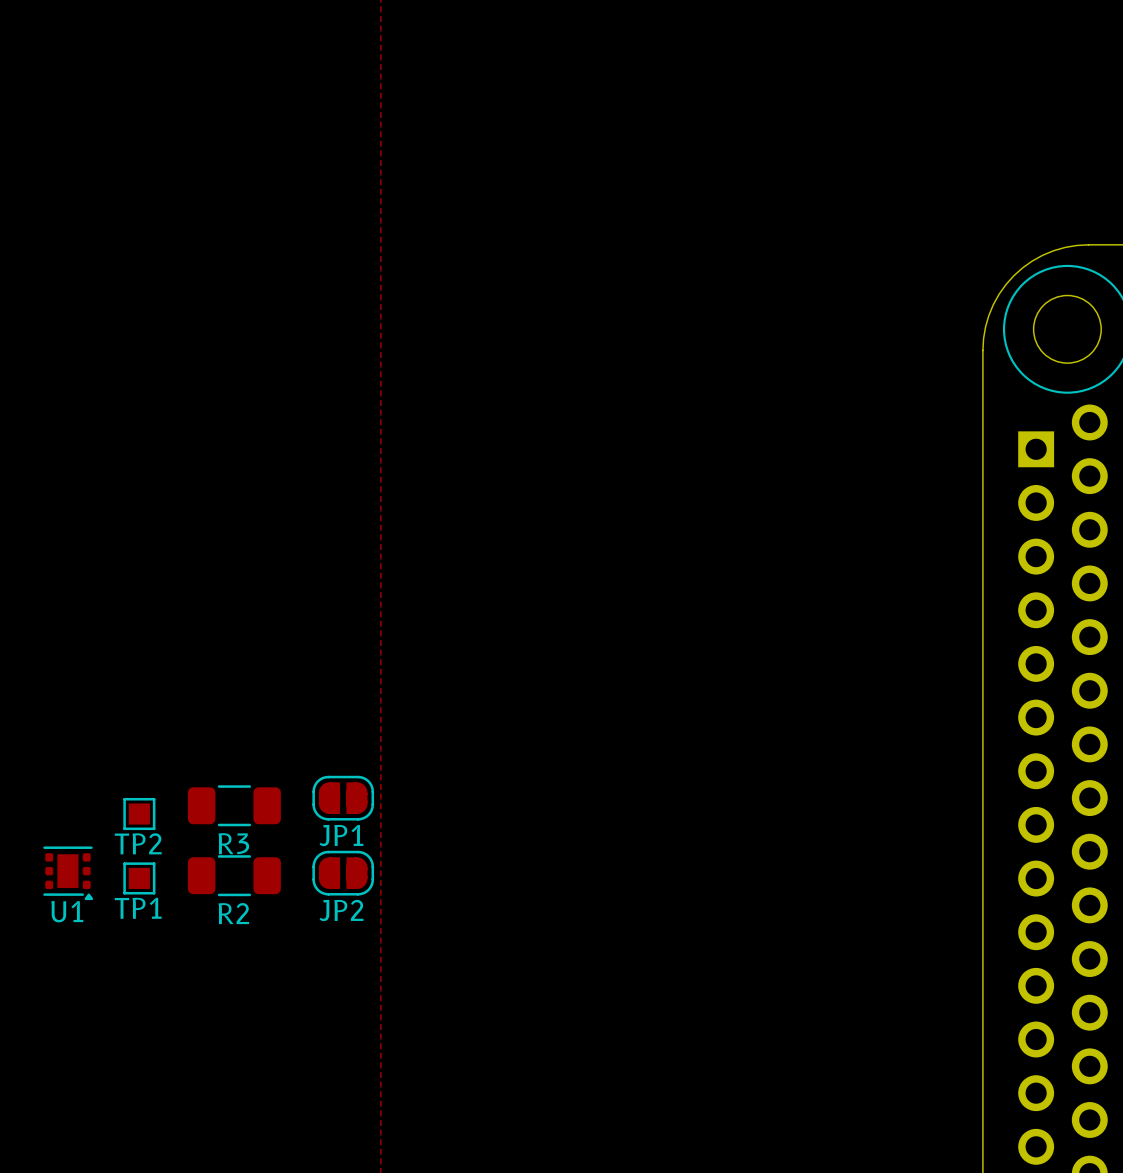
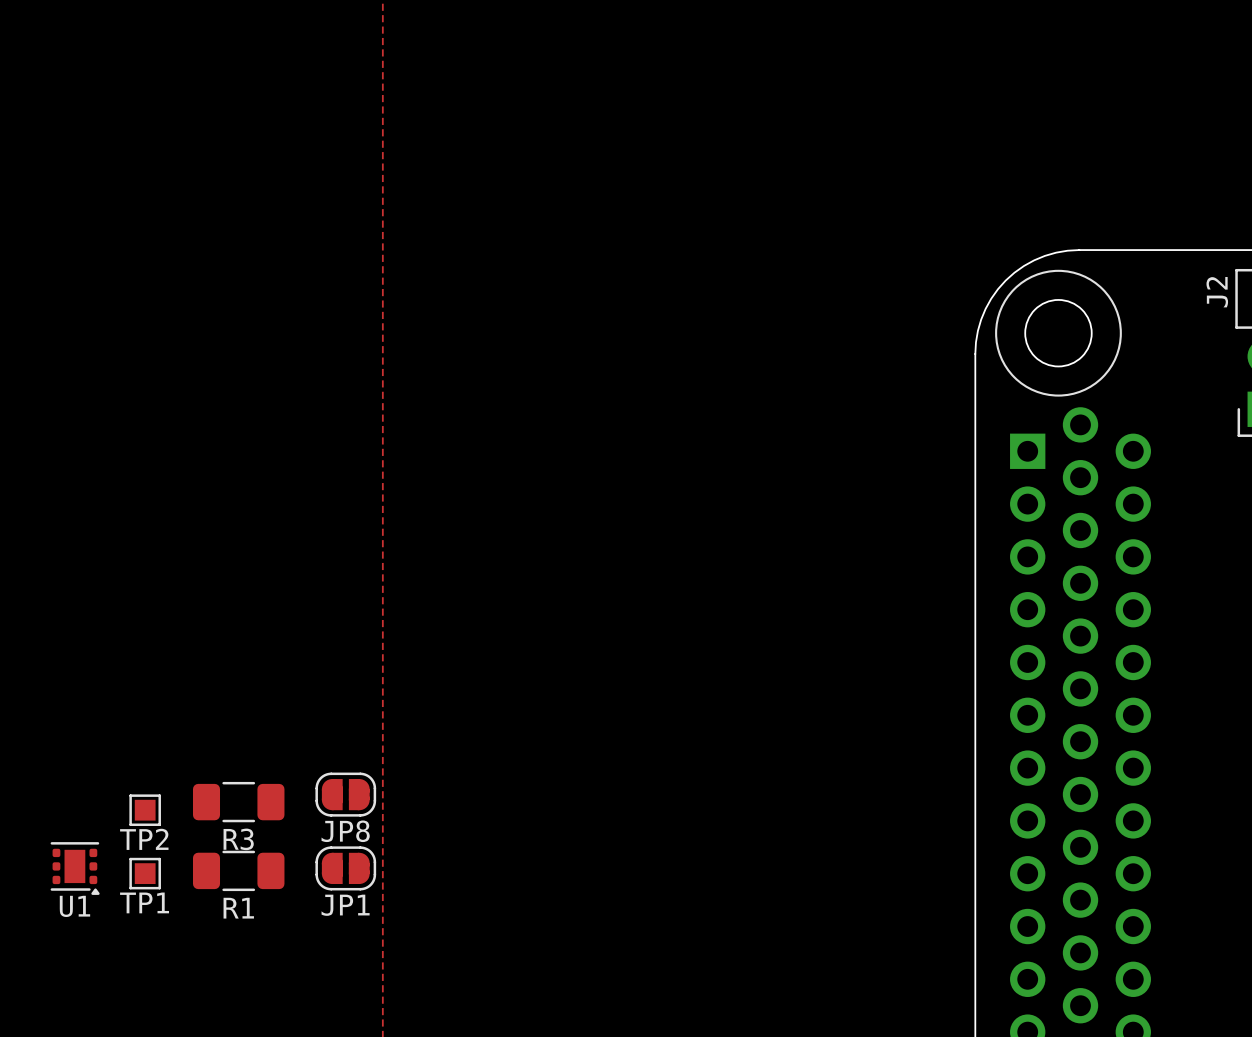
JP1 name: JP1 (341, 835) -> JP8 (345, 831)
JP2 name: JP2 (341, 910) -> JP1 (345, 905)
R2 name: R2 (233, 913) -> R1 (238, 908)

